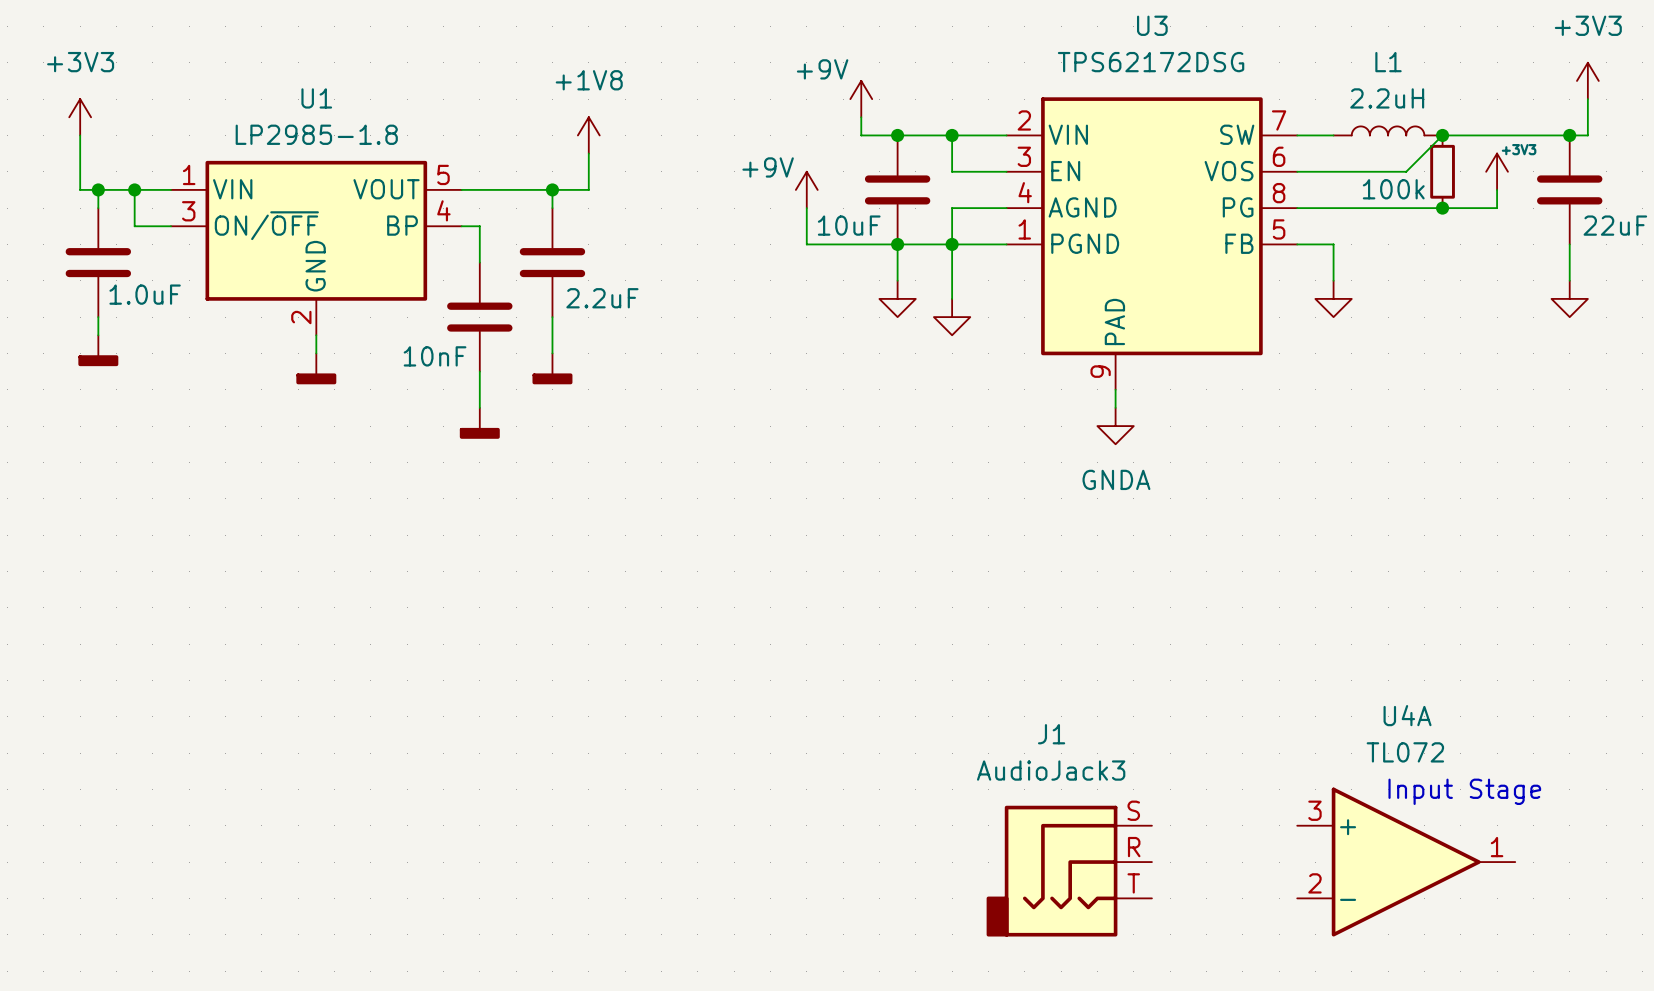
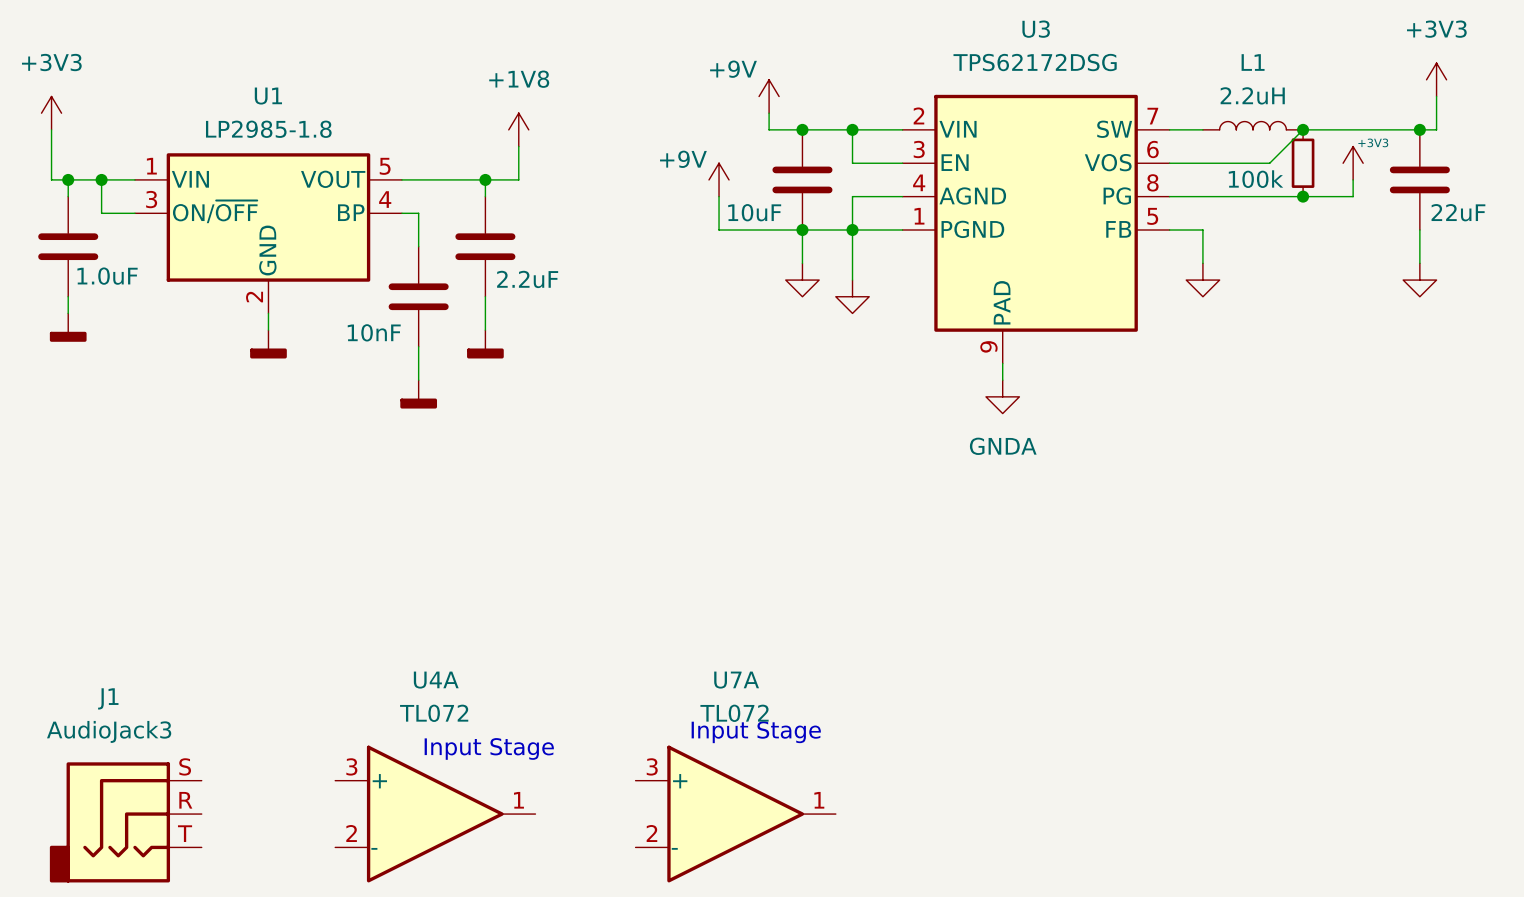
text: none -> Input Stage (756, 732)
text: Input Stage (1464, 791) -> none
text: none -> Input Stage (489, 748)
U4A position: (1406, 862) -> (435, 814)
J1 position: (1069, 871) -> (125, 822)
U7A: none -> TL072 (735, 814)

